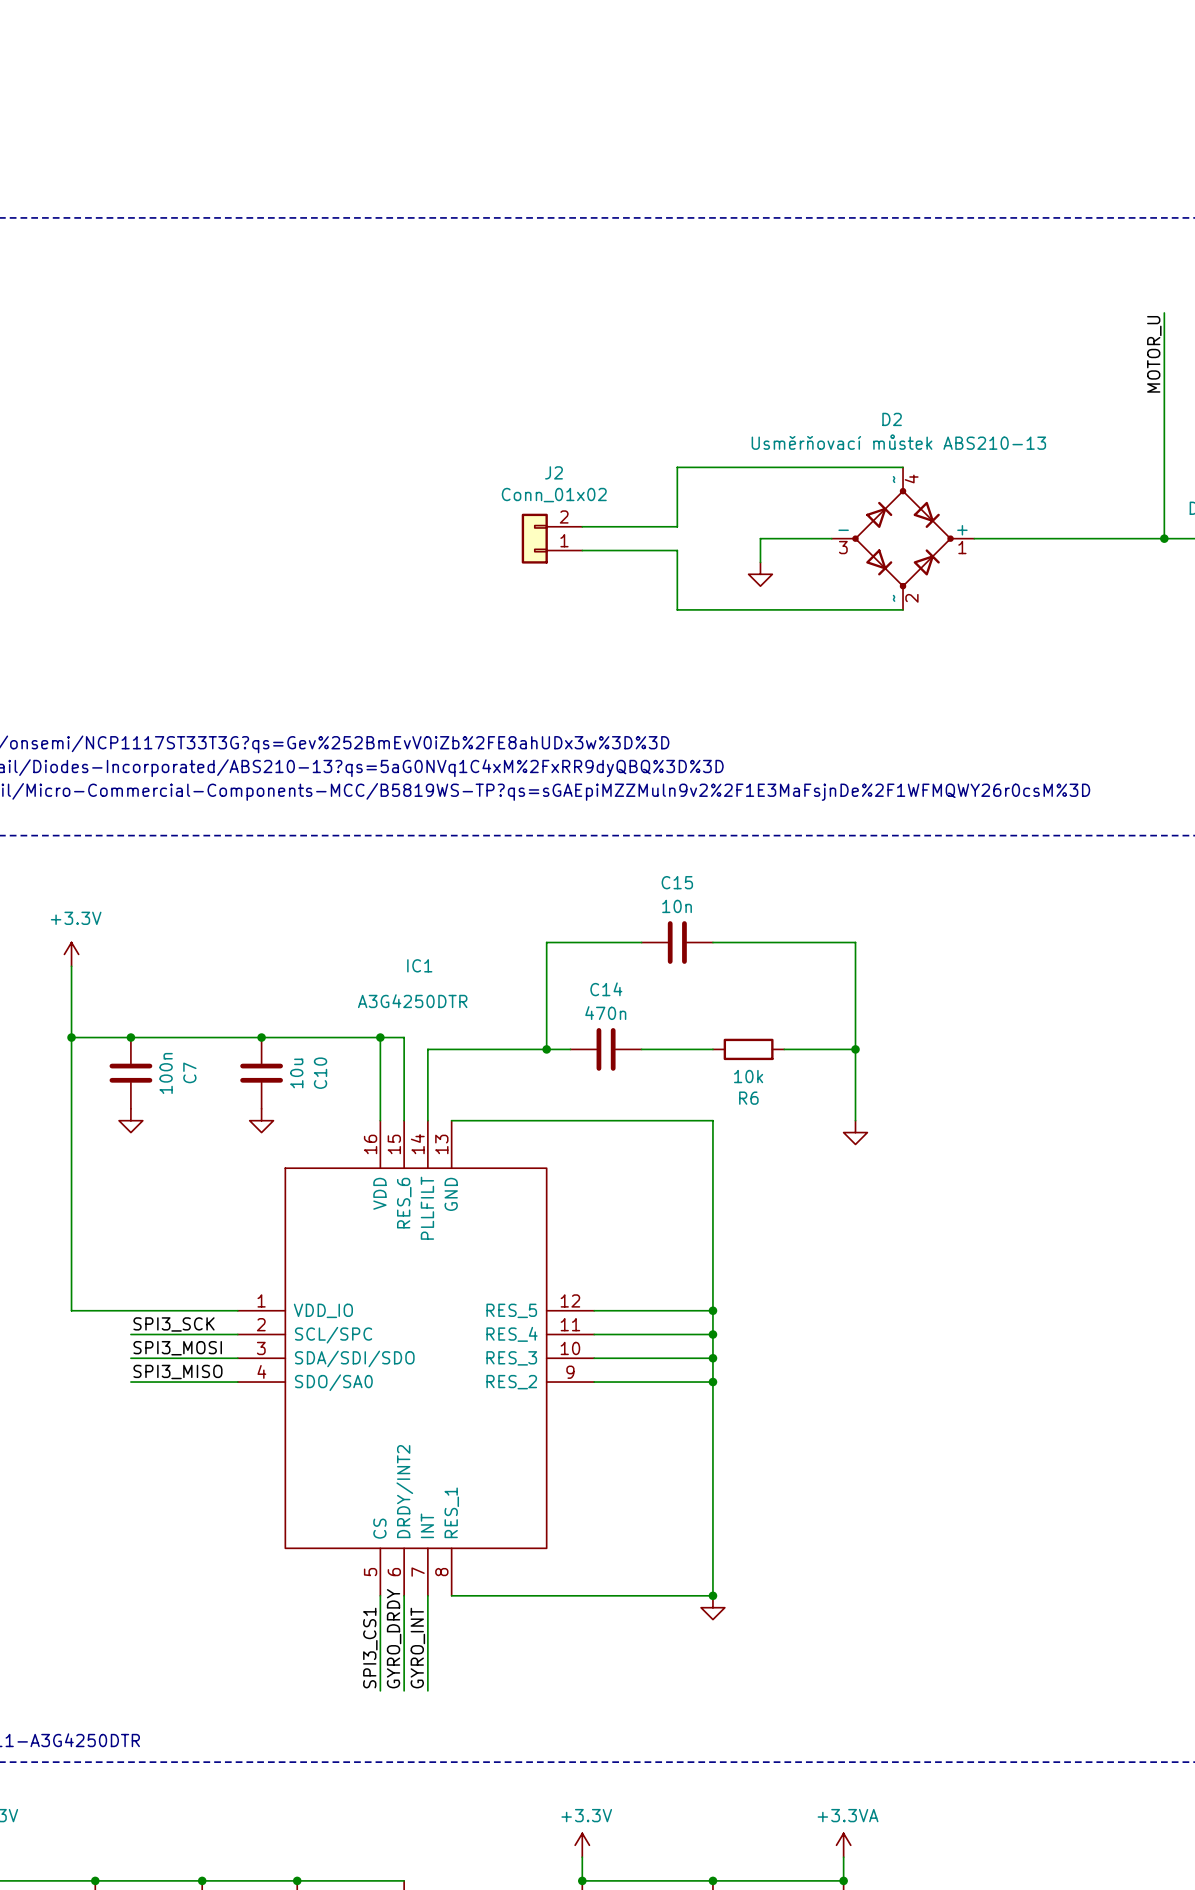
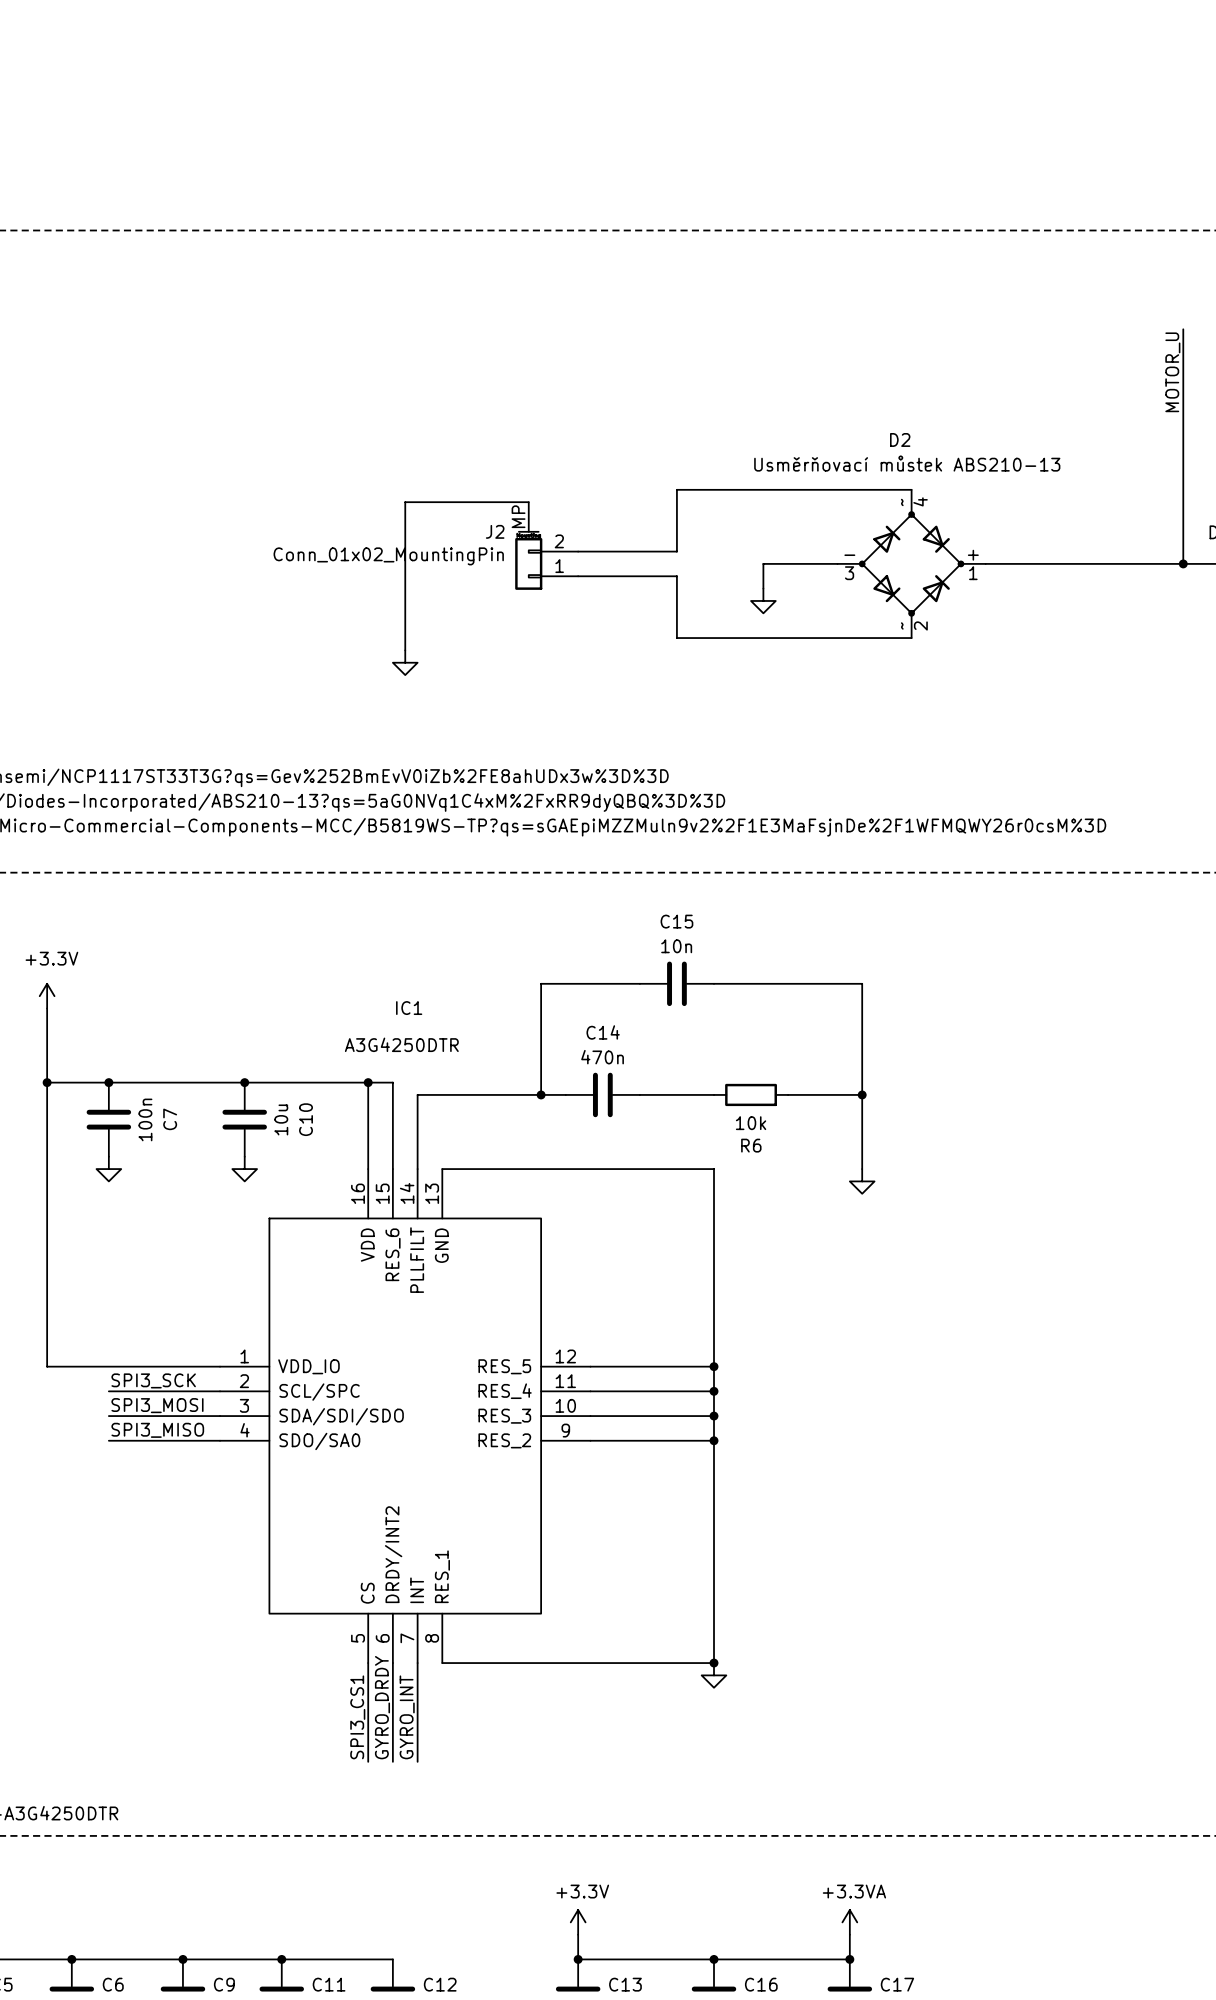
J2 name position: J2 (553, 472) -> J2 (495, 531)
wire: none -> (528, 502) (405, 502) (405, 650)
J2 value: Conn_01x02 (554, 495) -> Conn_01x02_MountingPin (388, 556)
J2 symbol: [521, 513, 583, 564] -> [515, 502, 579, 590]
power symbol: none -> (405, 662)

